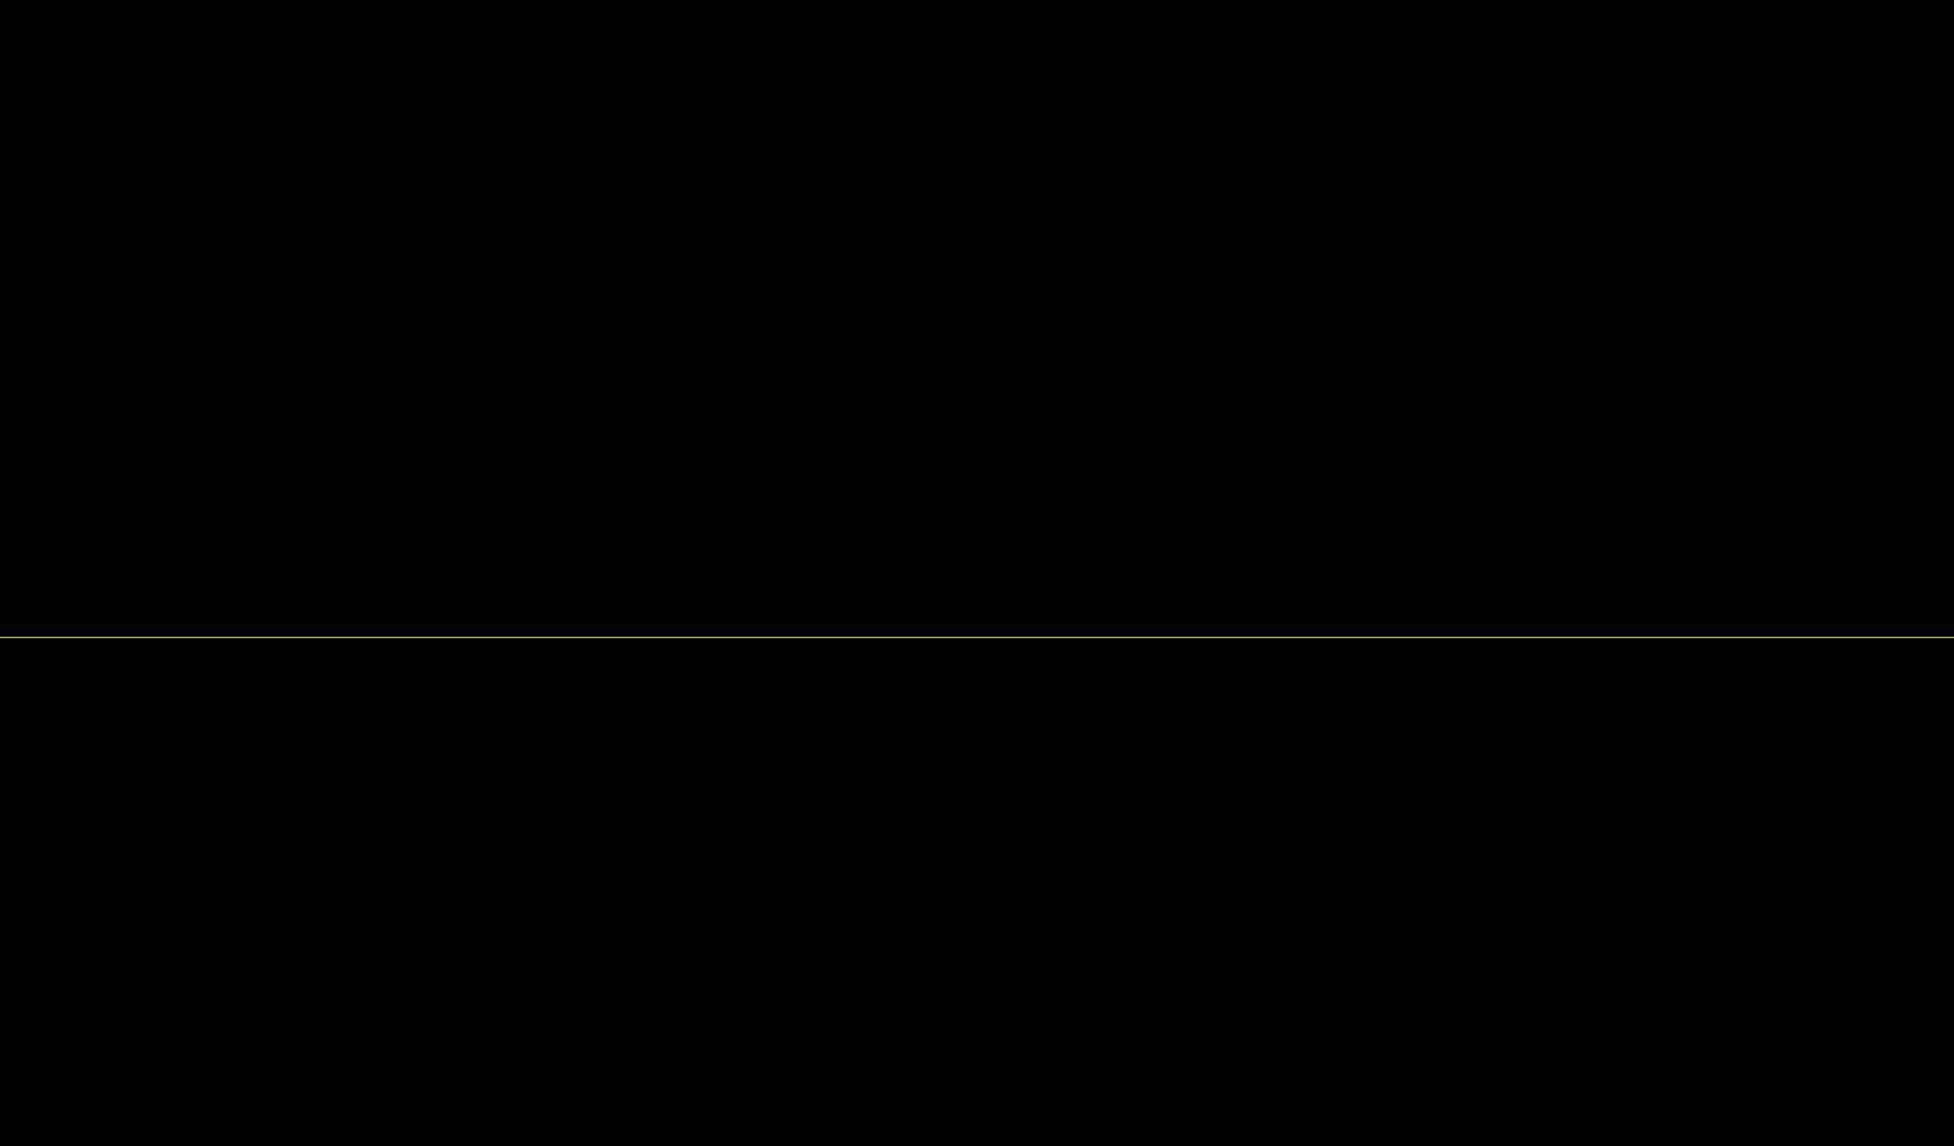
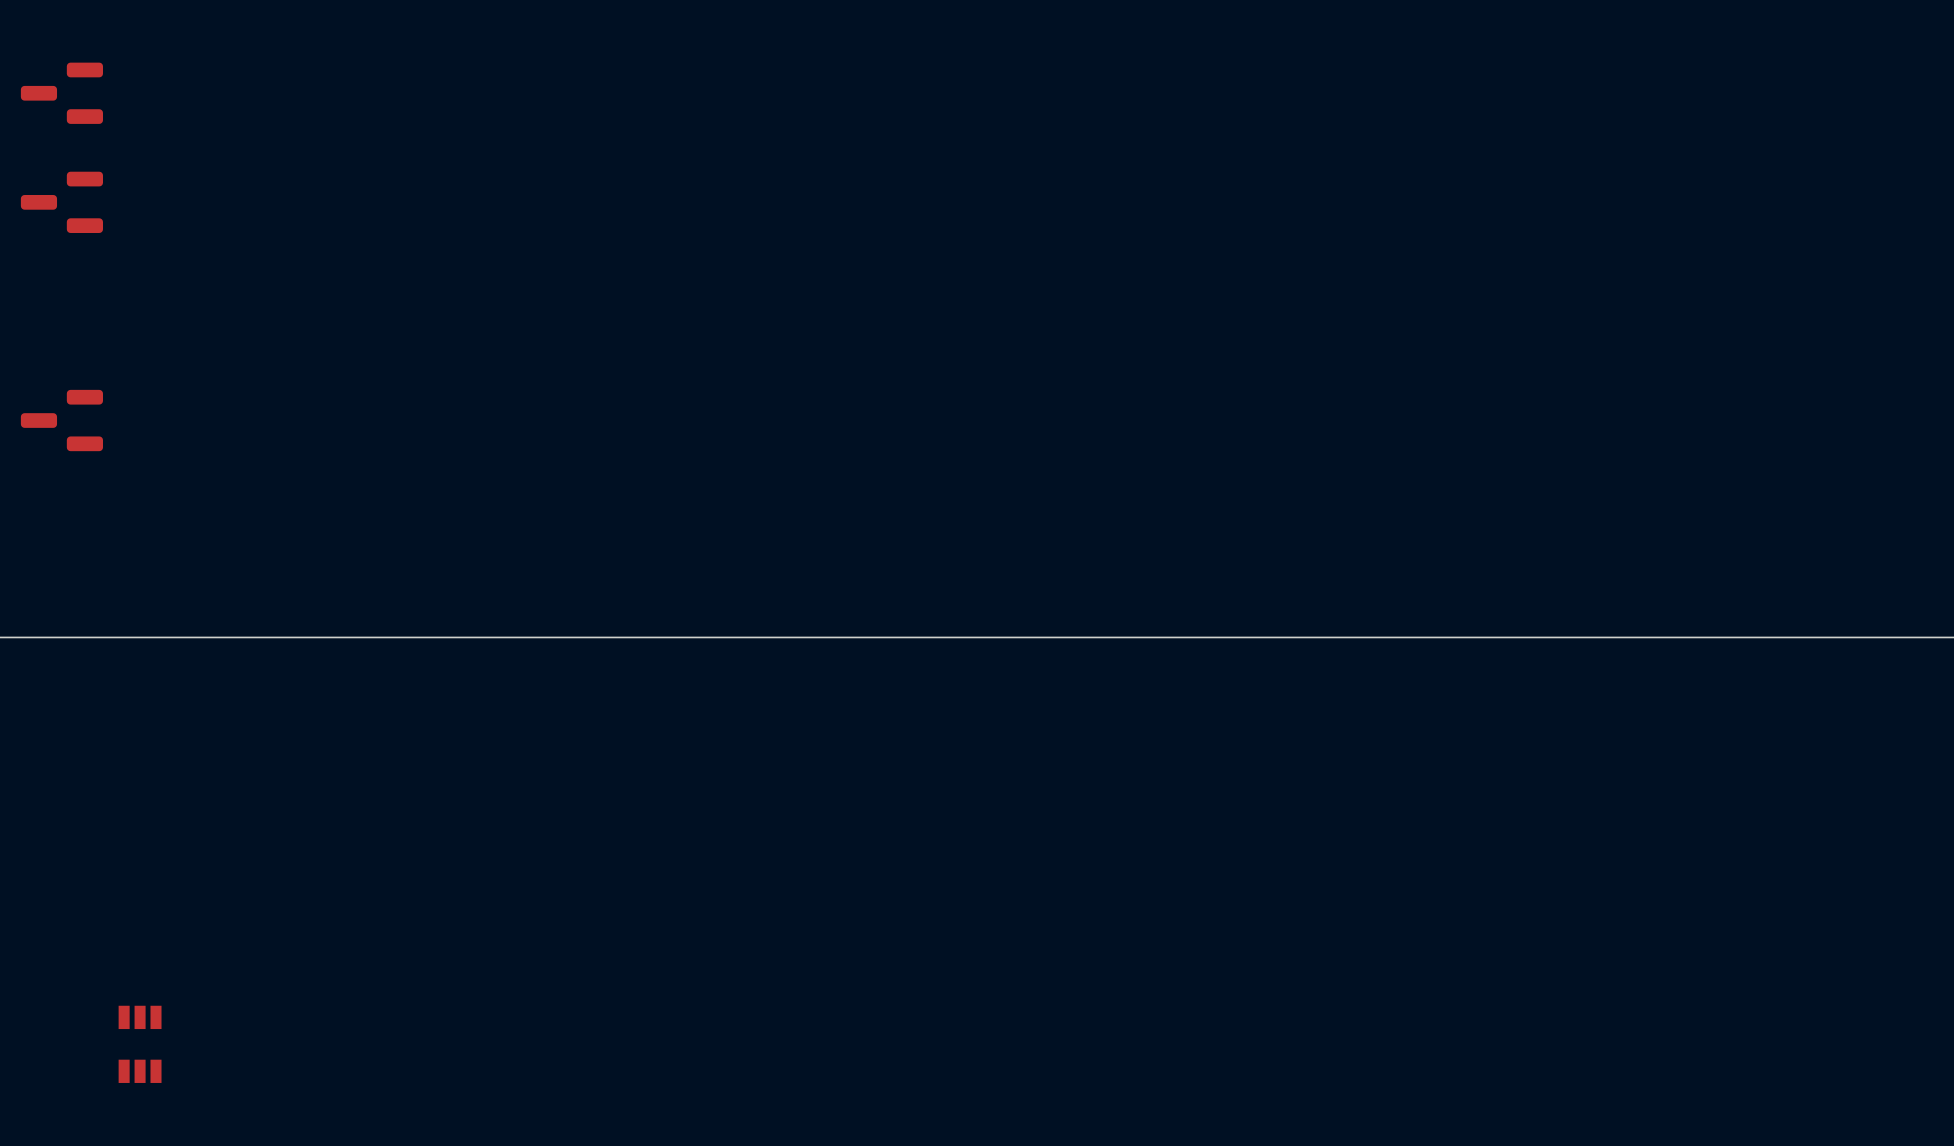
part: none -> (61, 93)
part: none -> (61, 202)
part: none -> (61, 420)
part: none -> (140, 1044)

